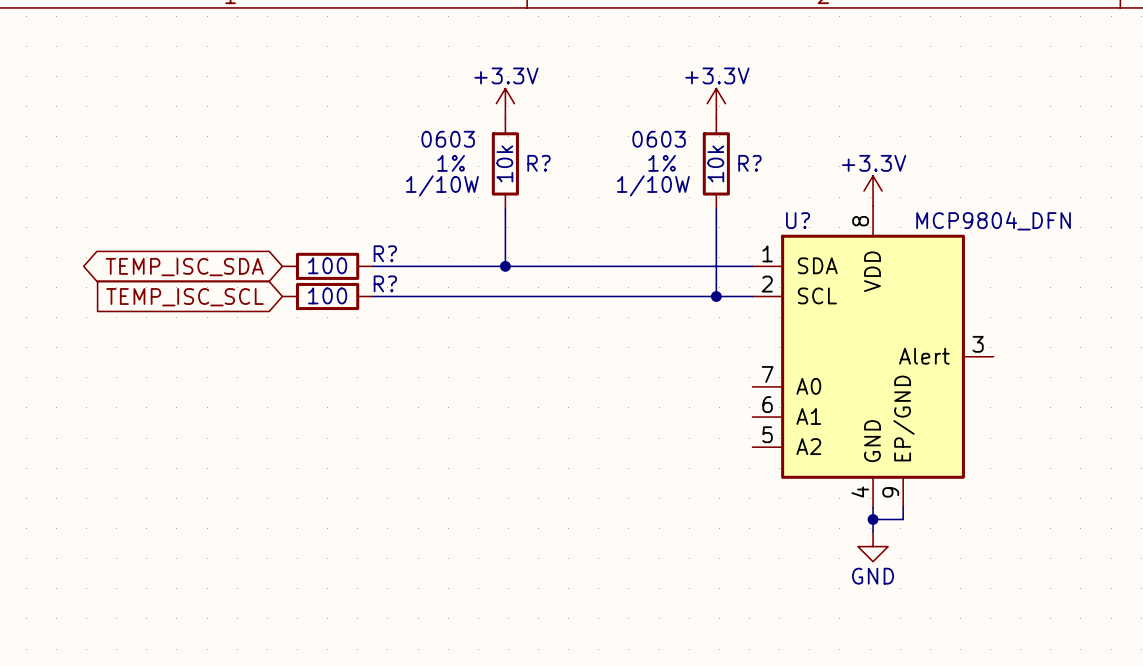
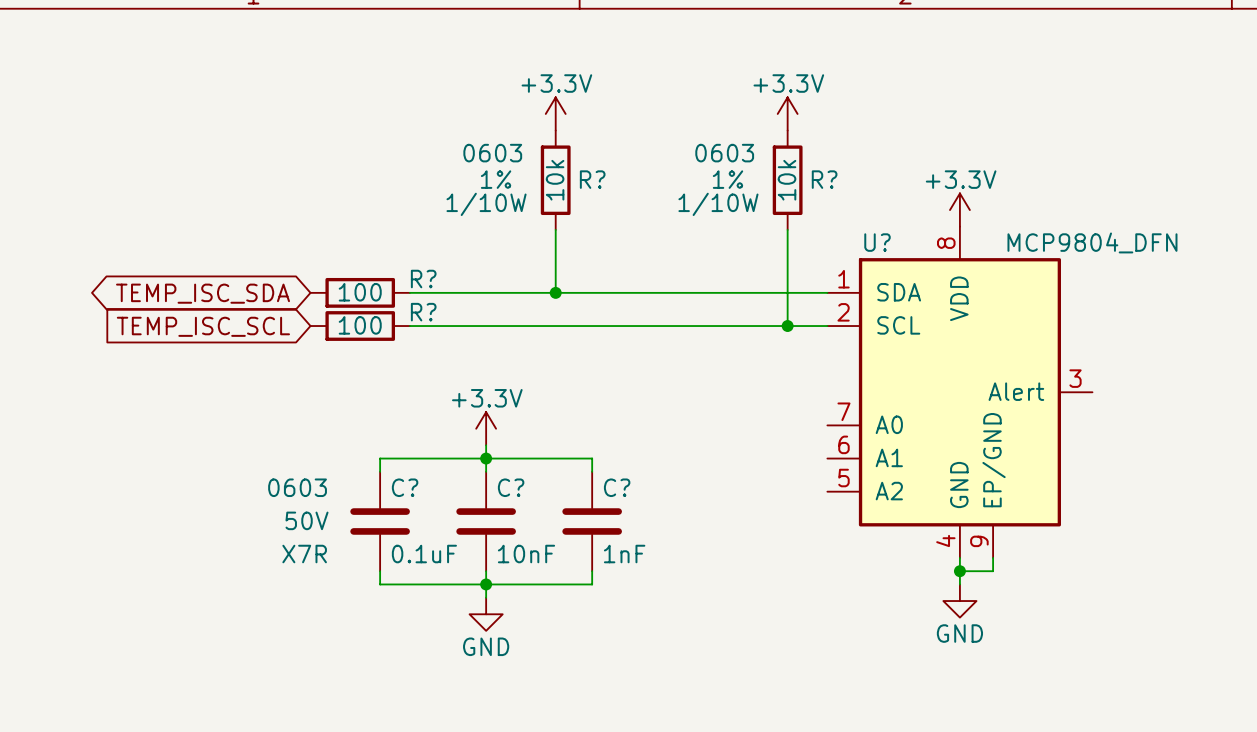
power symbol: none -> +3.3V (486, 428)
wire: none -> (486, 445) (486, 471)
junction: none -> (486, 458)
wire: none -> (380, 471) (380, 458) (592, 458) (592, 471)
C?: none -> 0.1uF (380, 521)
C?: none -> 10nF (486, 521)
C?: none -> 1nF (592, 521)
wire: none -> (380, 571) (380, 584) (592, 584) (592, 571)
wire: none -> (486, 571) (486, 597)
junction: none -> (486, 584)
power symbol: none -> GND (486, 614)

